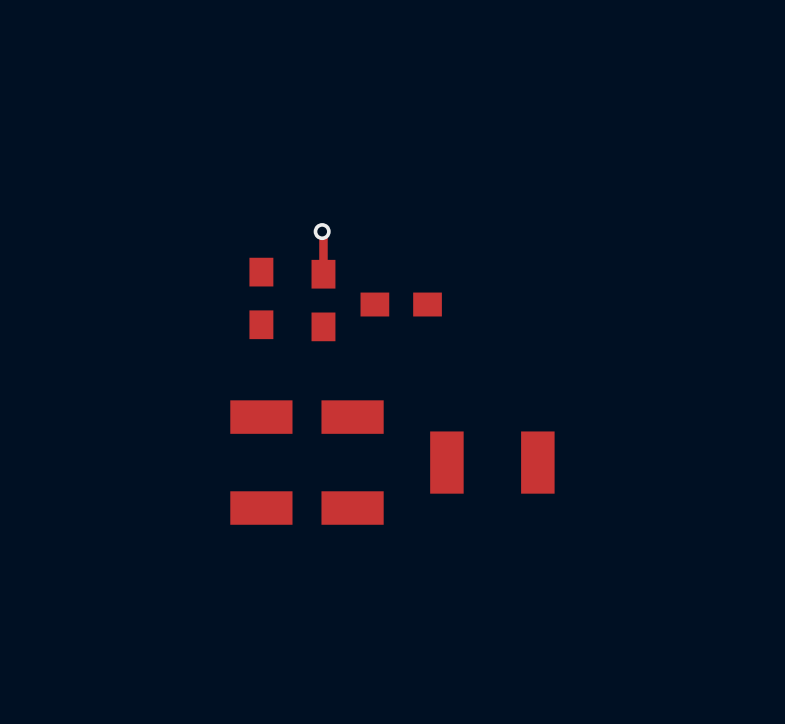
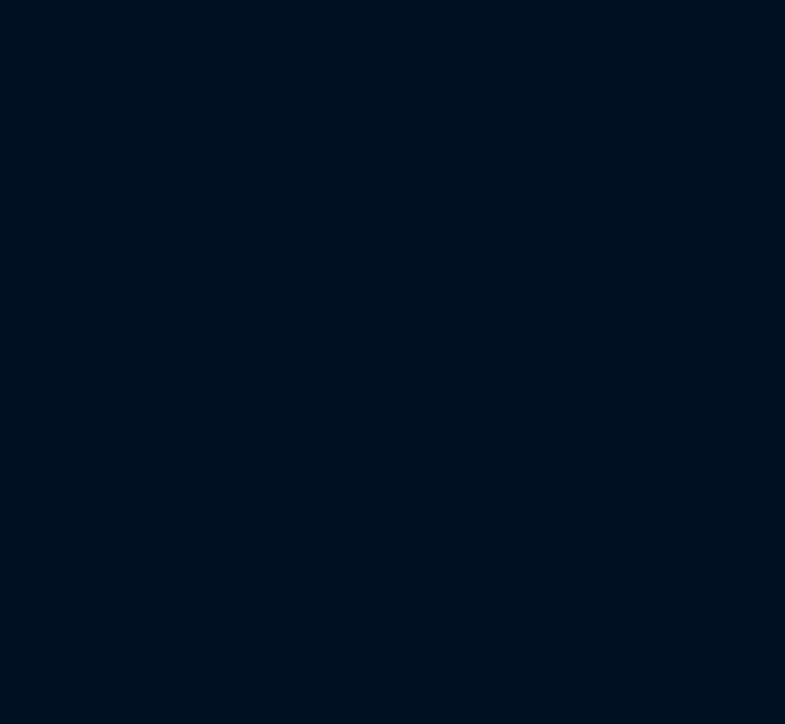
top track: (322, 231) (323, 274) -> none
via: (322, 231) -> none
part: (261, 298) -> none
part: (323, 300) -> none
part: (401, 304) -> none
part: (261, 462) -> none
part: (352, 462) -> none
part: (492, 462) -> none

